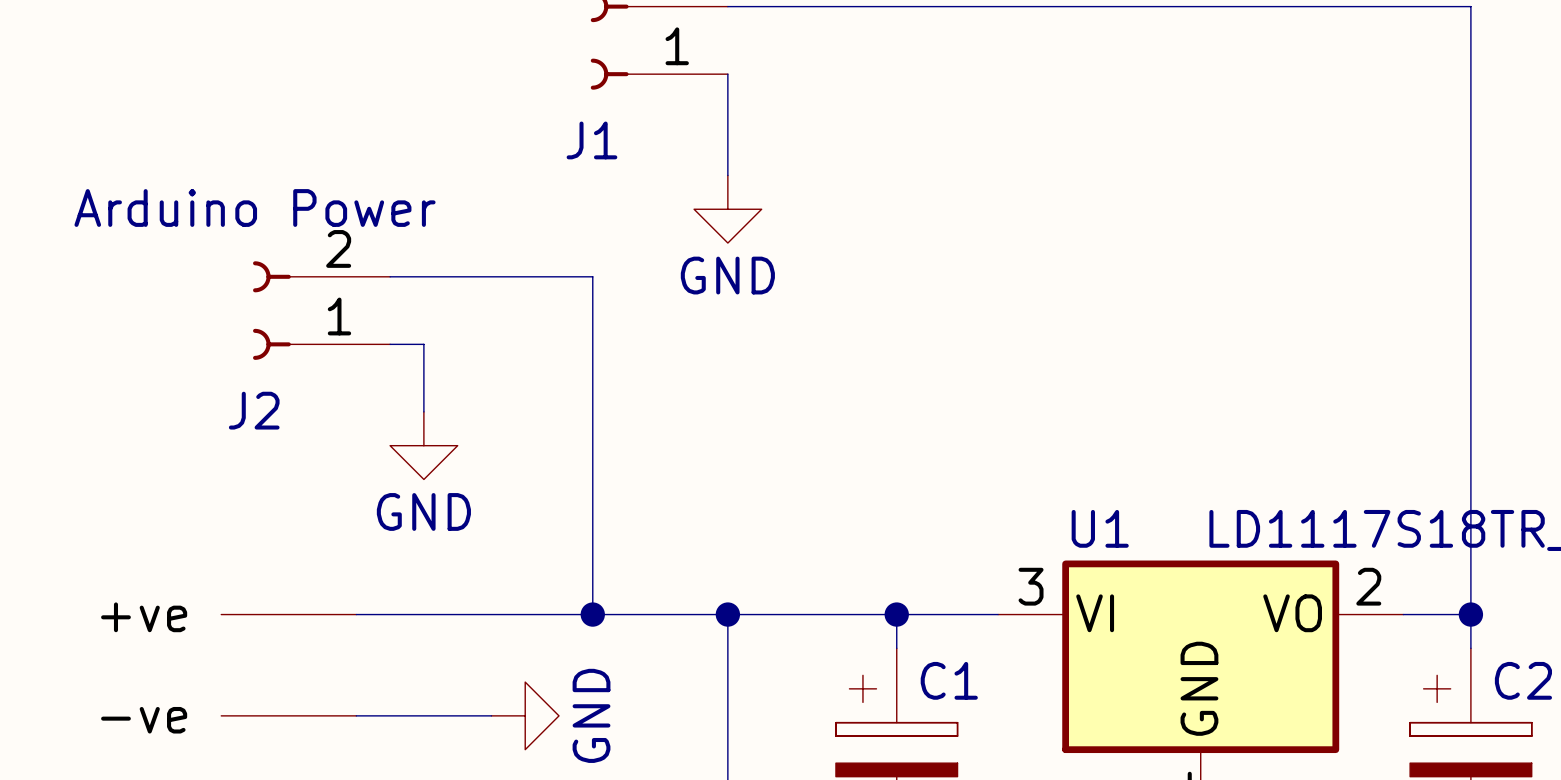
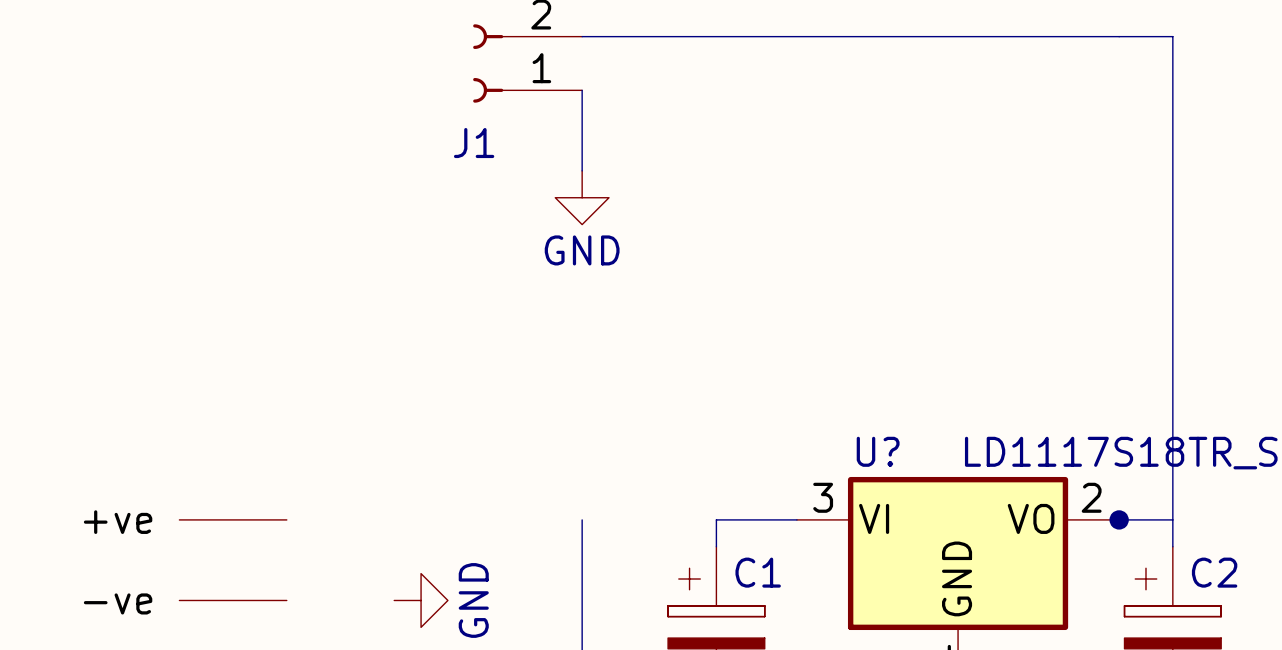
wire: (390, 276) (592, 276) (592, 614) -> none
J2: Arduino Power (321, 310) -> none
wire: (390, 344) (423, 344) (423, 411) -> none
power symbol: GND (423, 445) -> none
U1 name: U1 (1100, 528) -> U? (878, 451)
wire: (356, 614) (896, 614) -> none
junction: (592, 614) -> none
junction: (727, 614) -> none
junction: (896, 614) -> none
junction position: (1470, 614) -> (1119, 519)
wire: (356, 715) (491, 715) -> none

